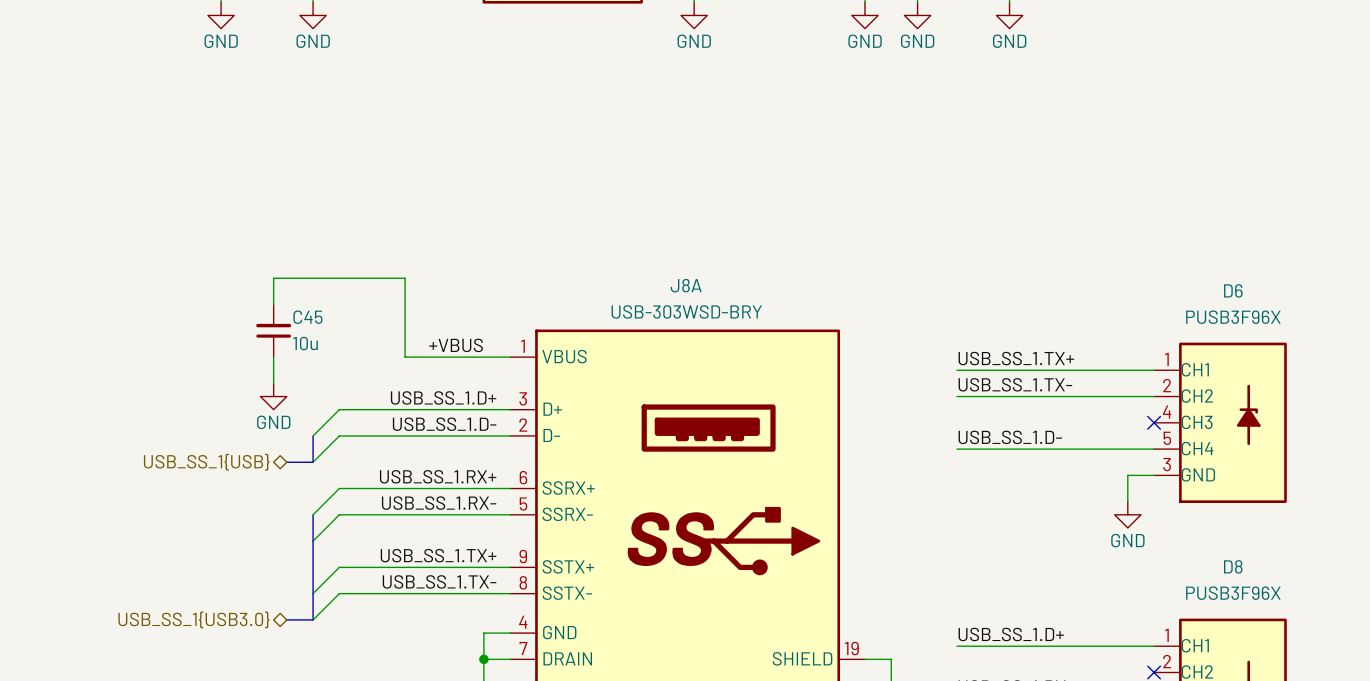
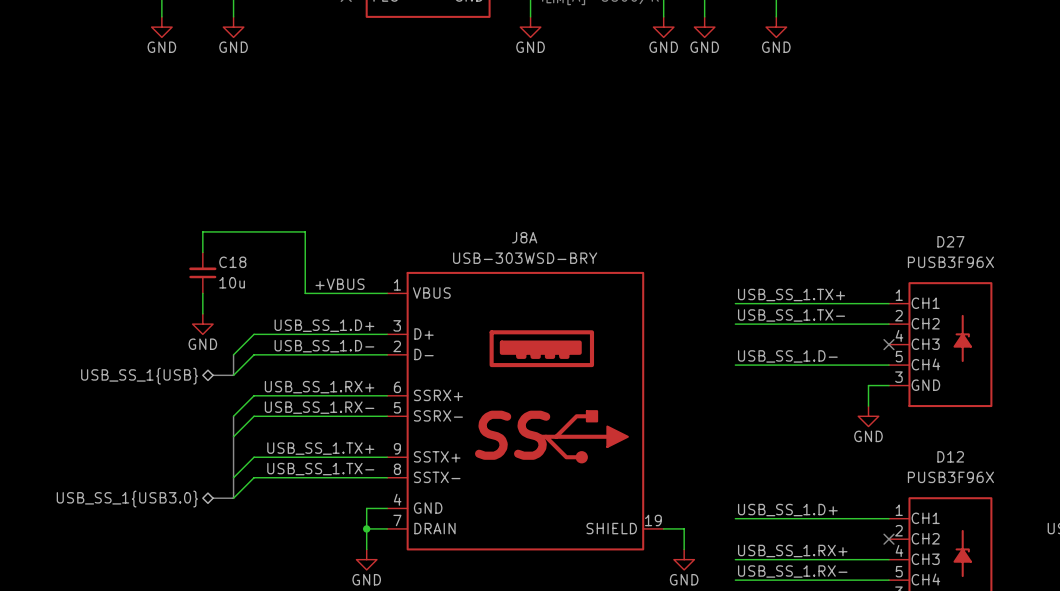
D6 name: D6 (1233, 290) -> D27 (950, 241)
C45 name: C45 (307, 317) -> C18 (232, 262)
D8 name: D8 (1233, 566) -> D12 (950, 456)

